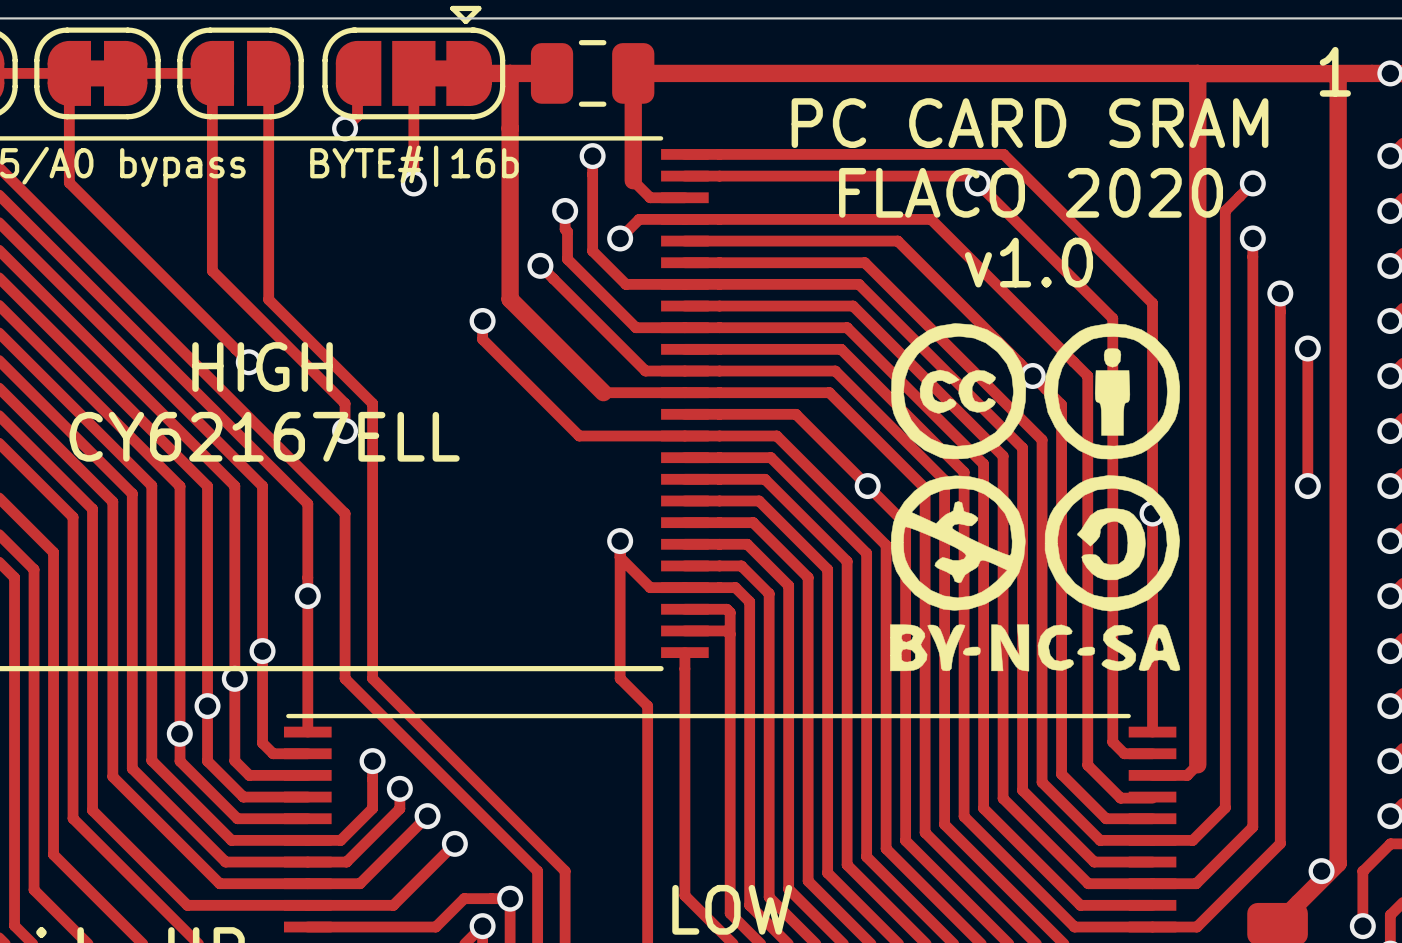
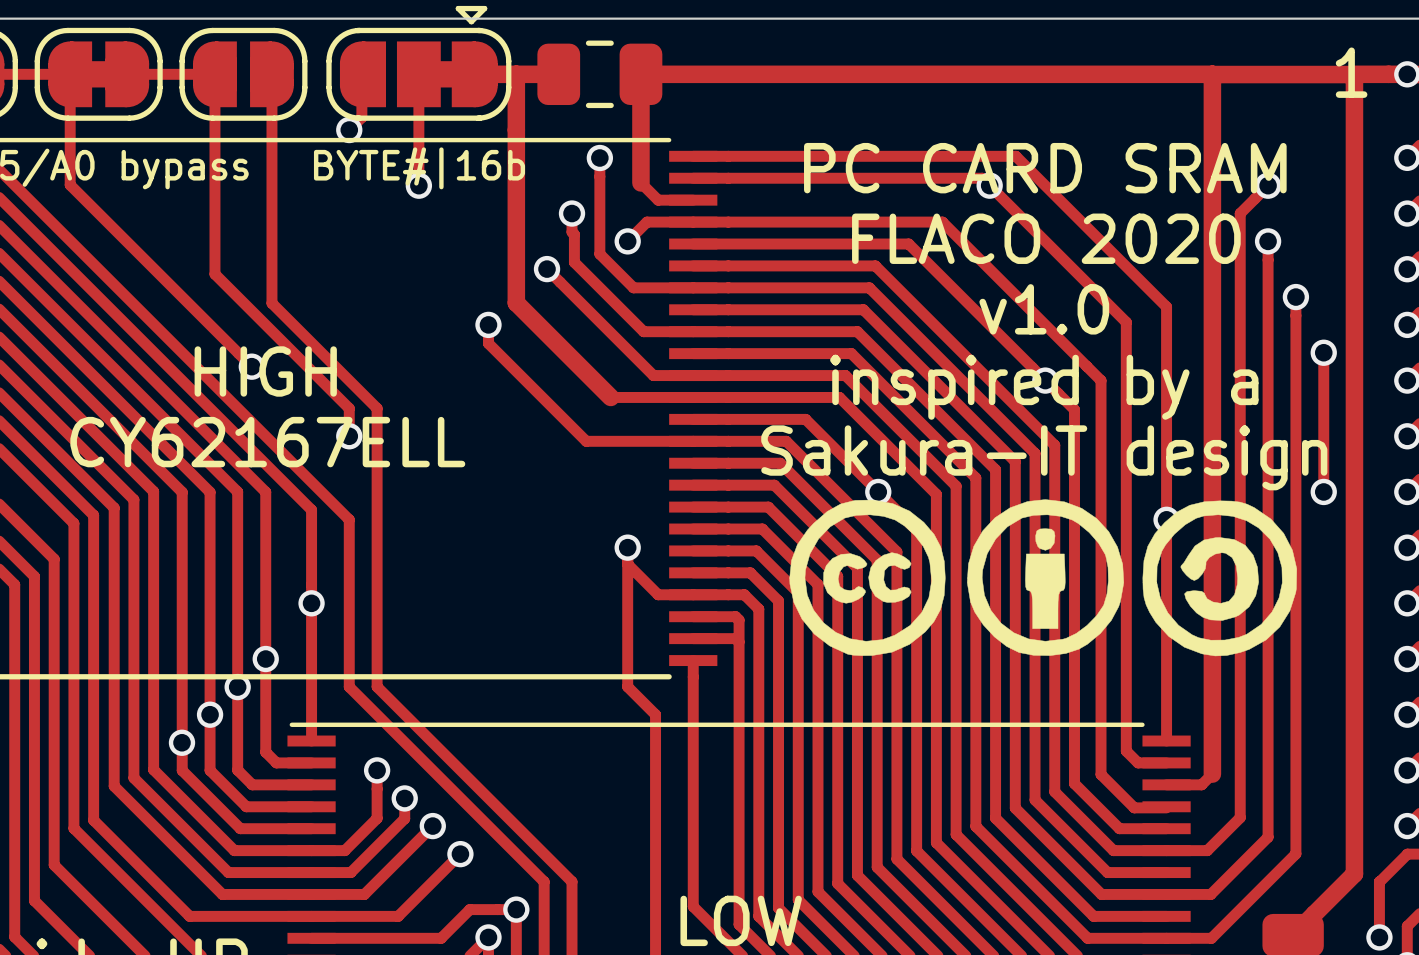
text position: PC CARD SRAM (1030, 123) -> PC CARD SRAM (1045, 168)
text position: FLACO 2020 (1031, 192) -> FLACO 2020 (1046, 238)
text position: v1.0 (1028, 262) -> v1.0 (1044, 309)
drawing: [890, 323, 1181, 672] -> none
text: none -> inspired by a (1044, 387)
text: none -> Sakura-IT design (1044, 457)
drawing: none -> [789, 499, 1297, 657]
via: (1321, 871) -> none

